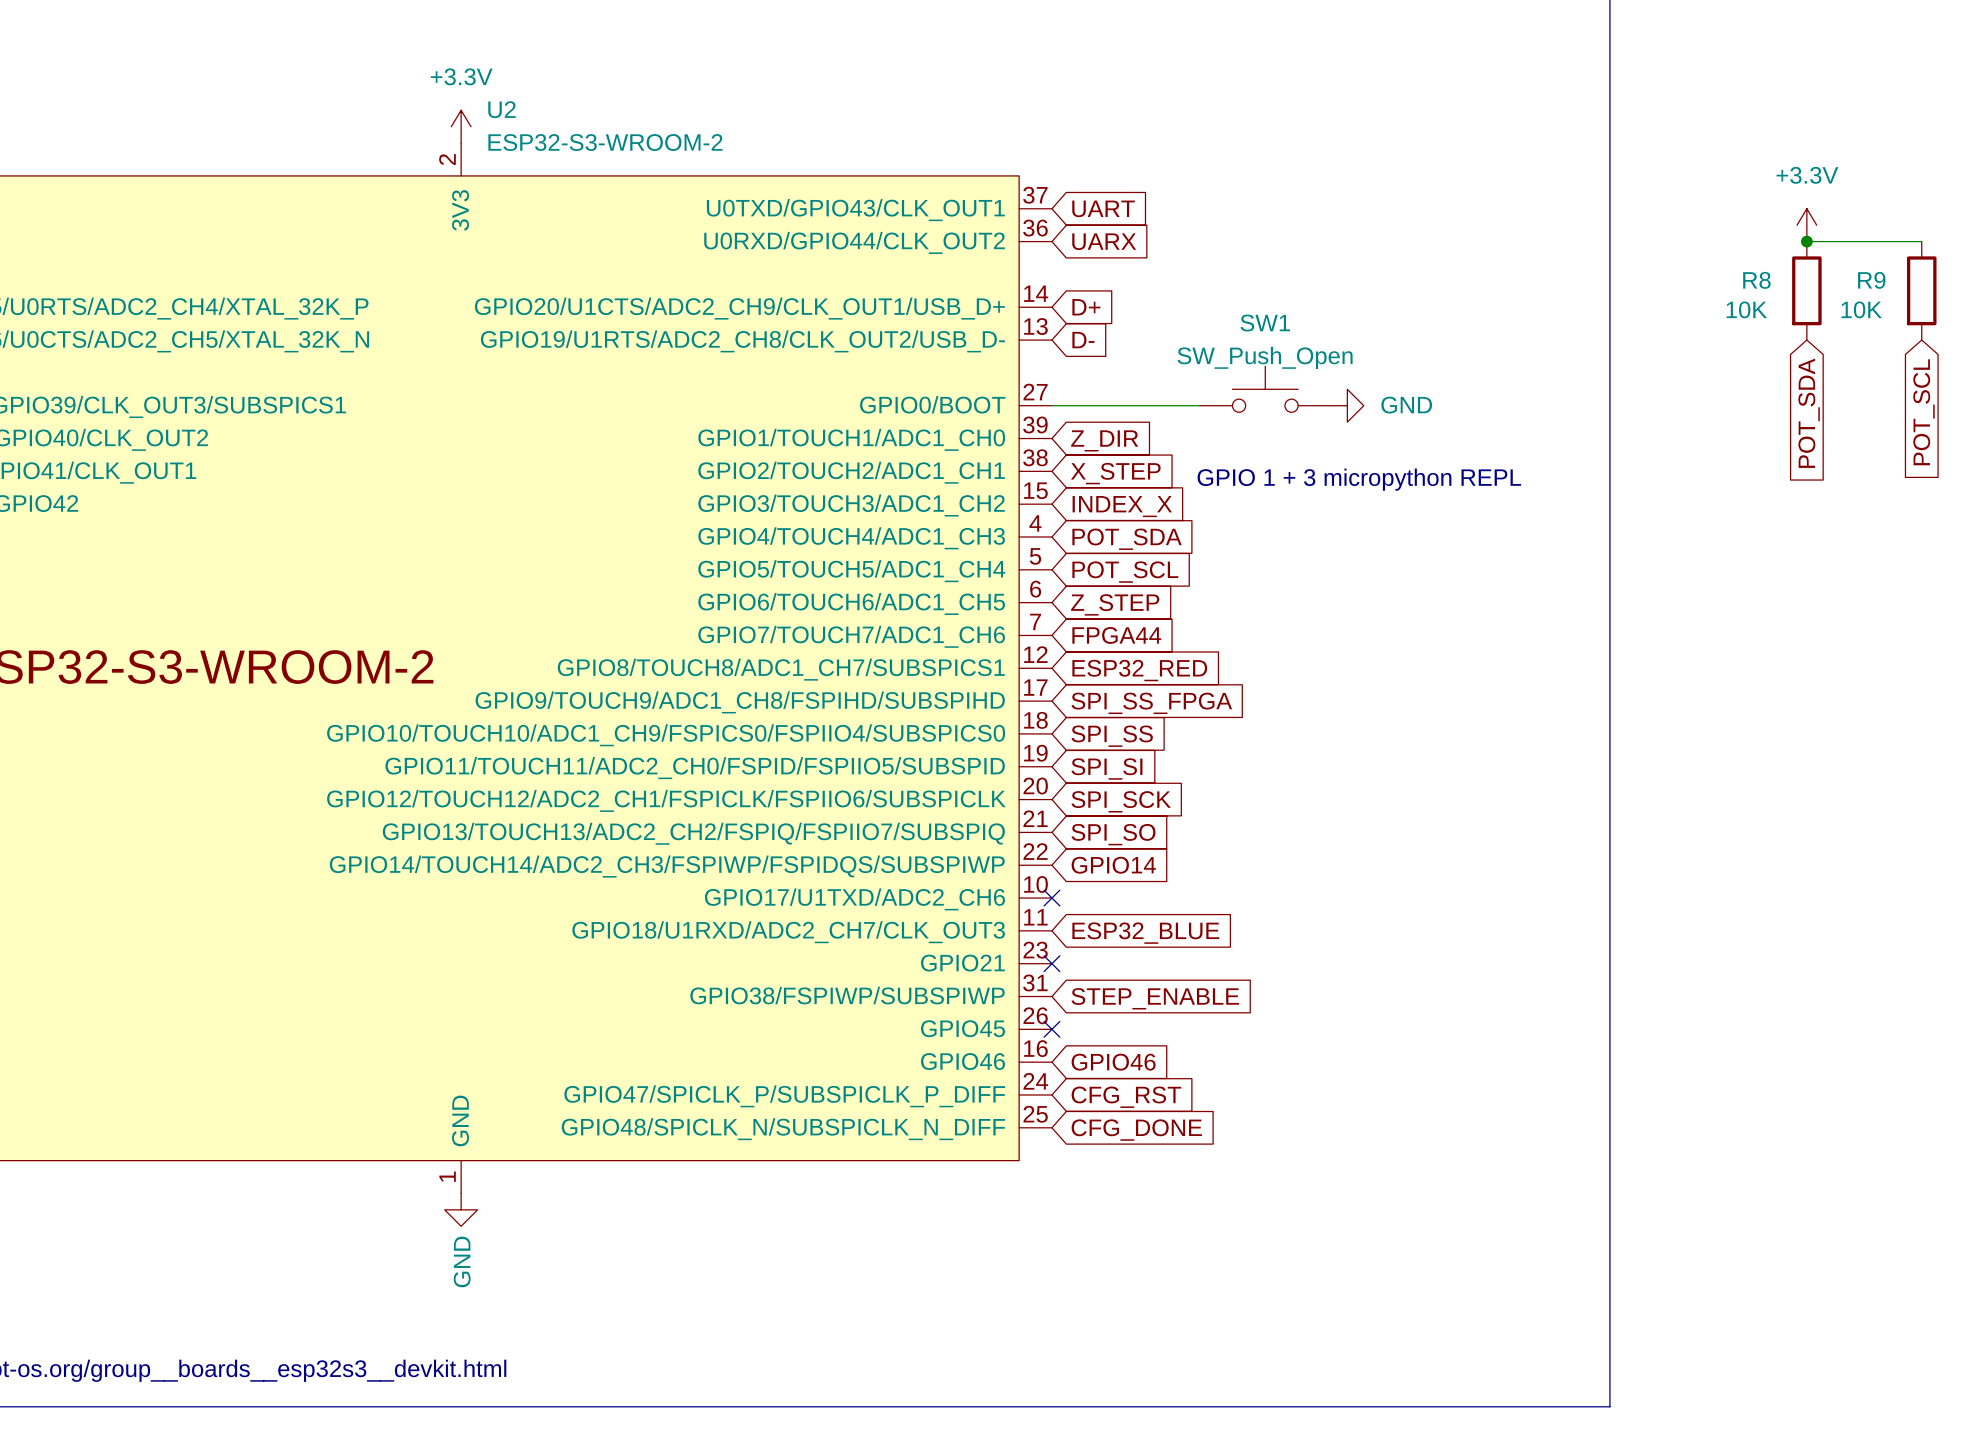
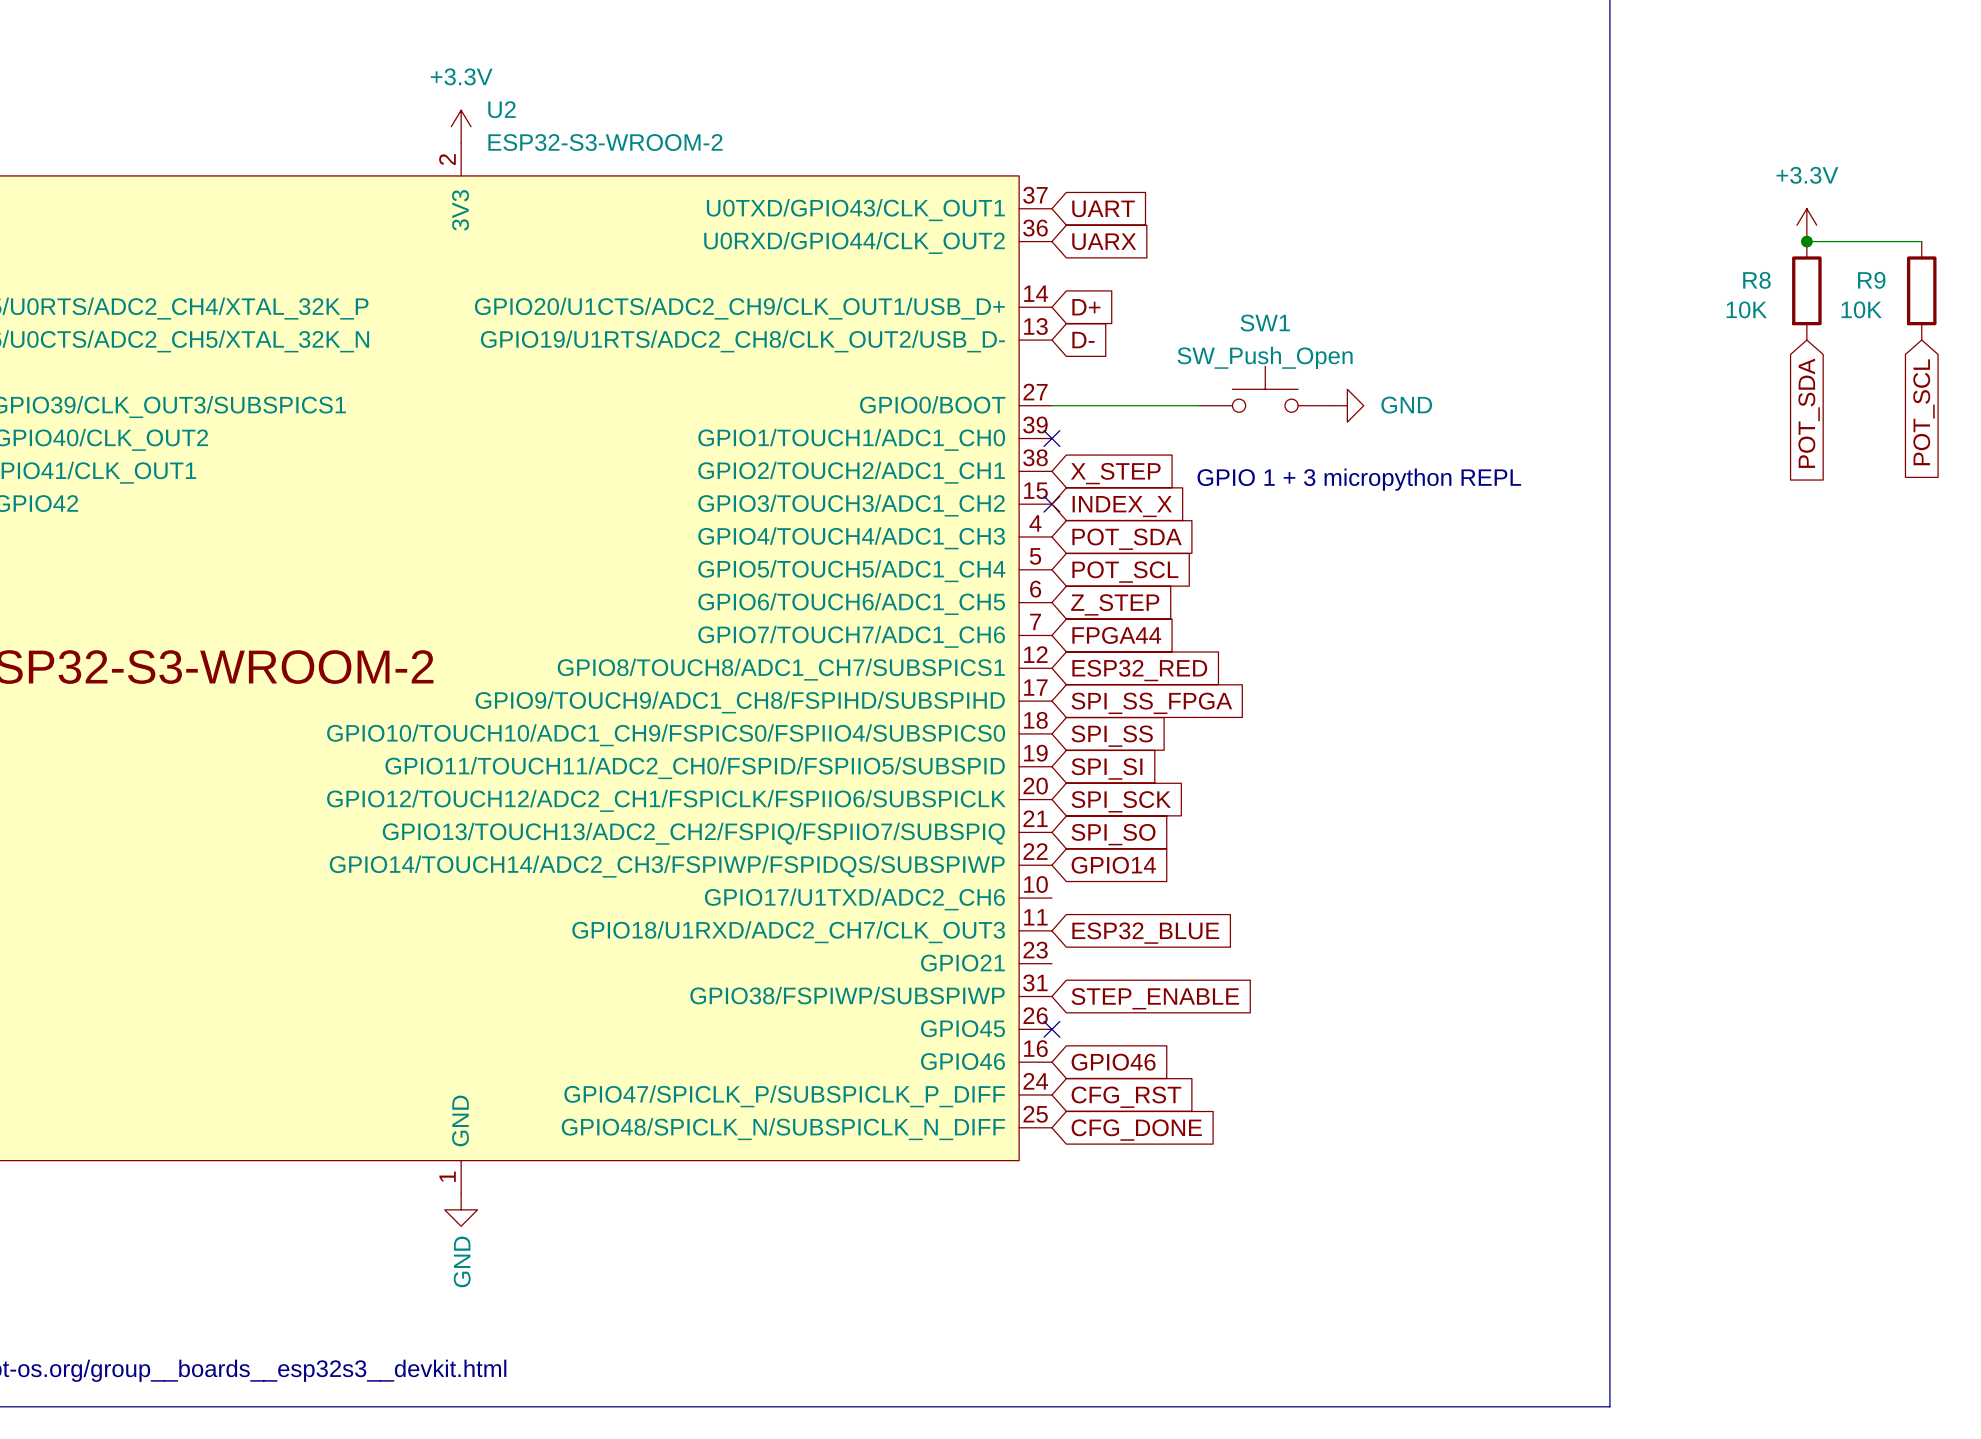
no-connect mark: none -> (1051, 438)
global label: Z_DIR (1104, 440) -> none
no-connect mark: none -> (1051, 504)
no-connect mark: (1051, 898) -> none
no-connect mark: (1051, 963) -> none

